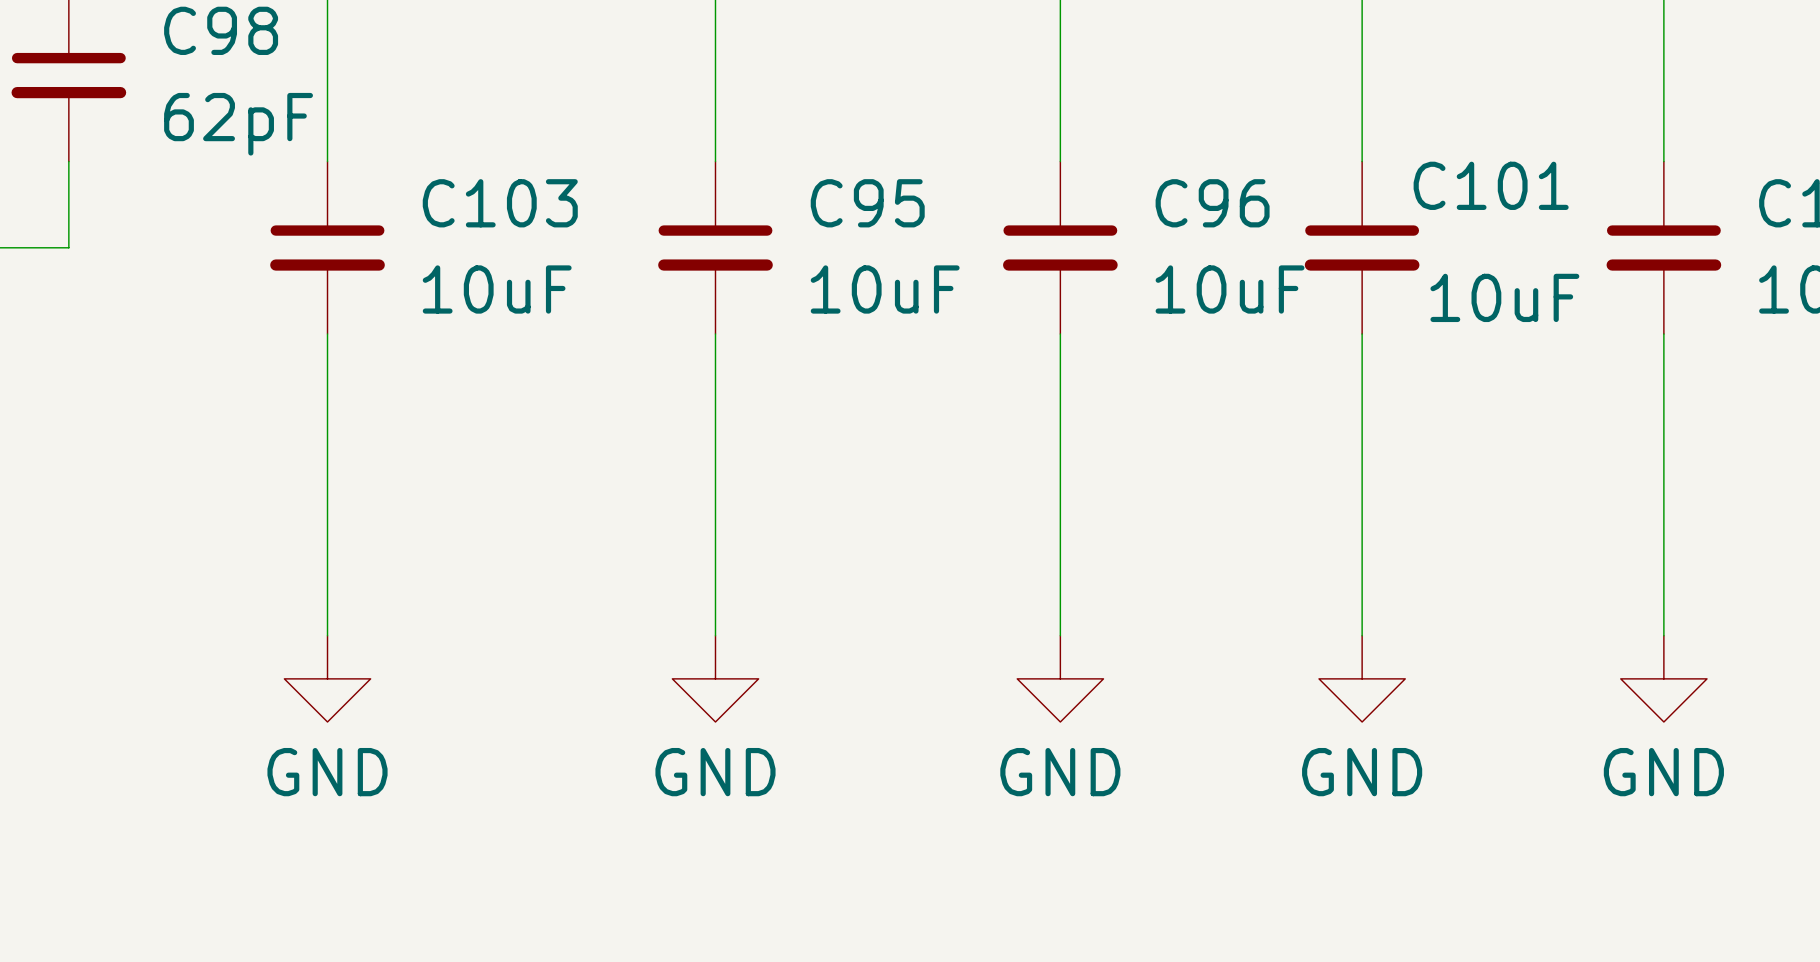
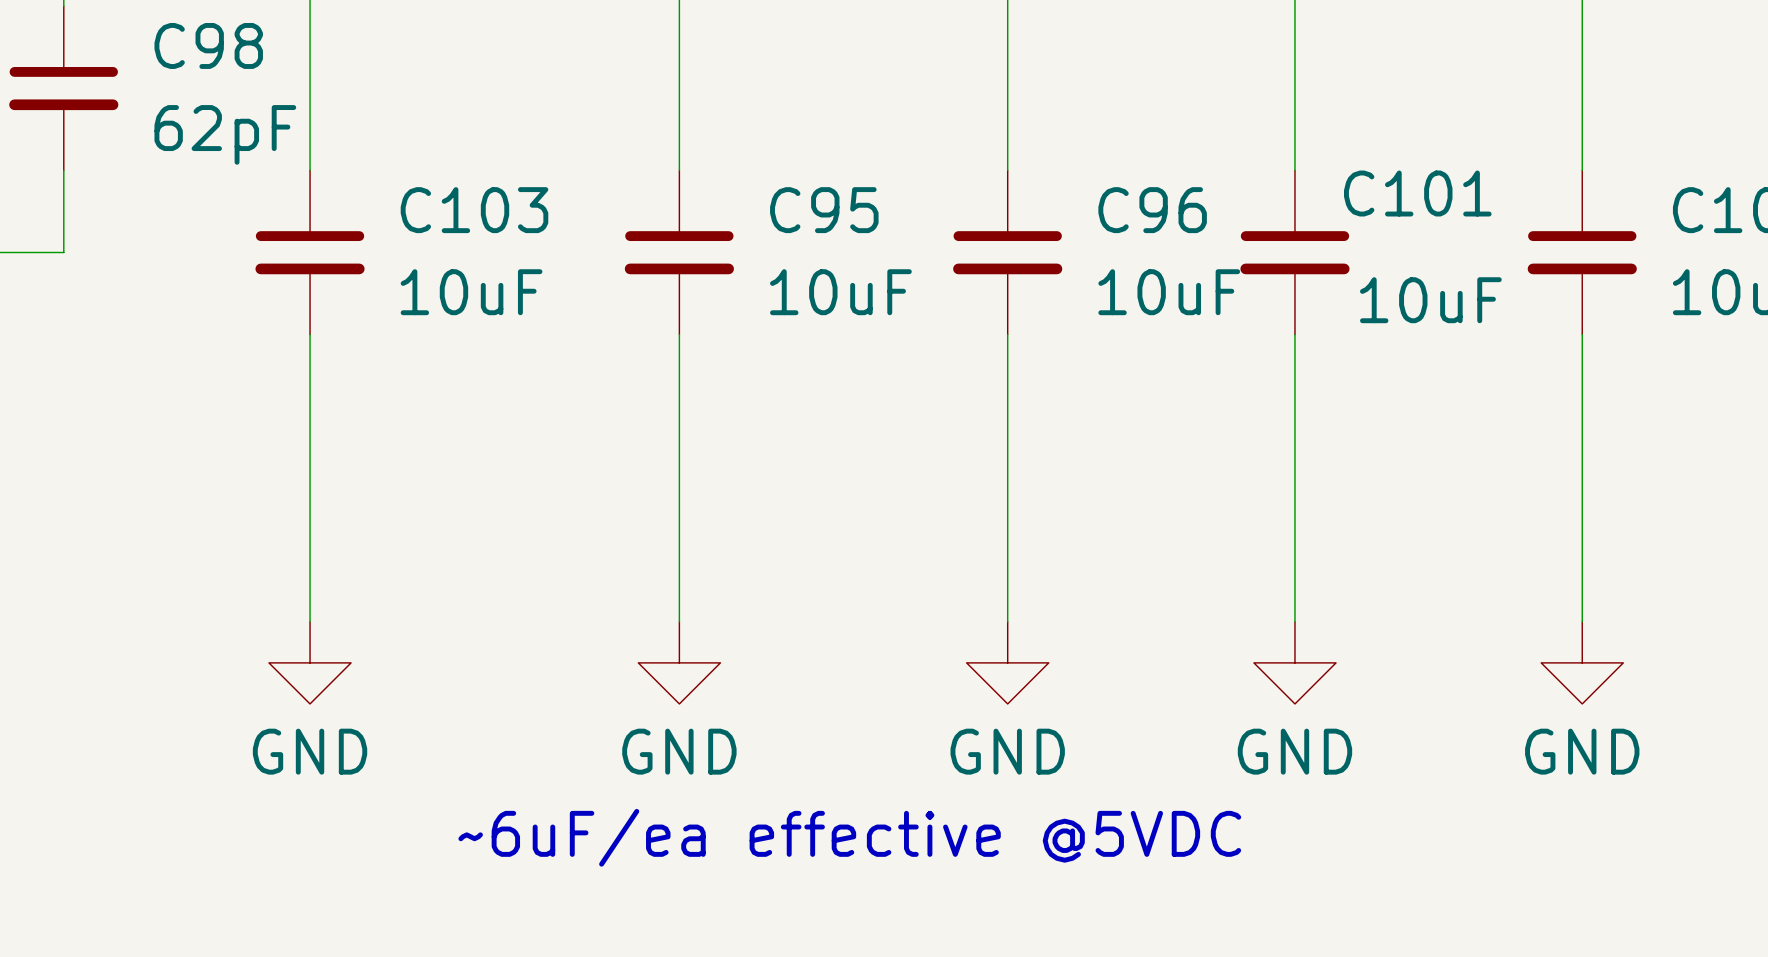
text: none -> ~6uF/ea effective @5VDC (849, 837)

